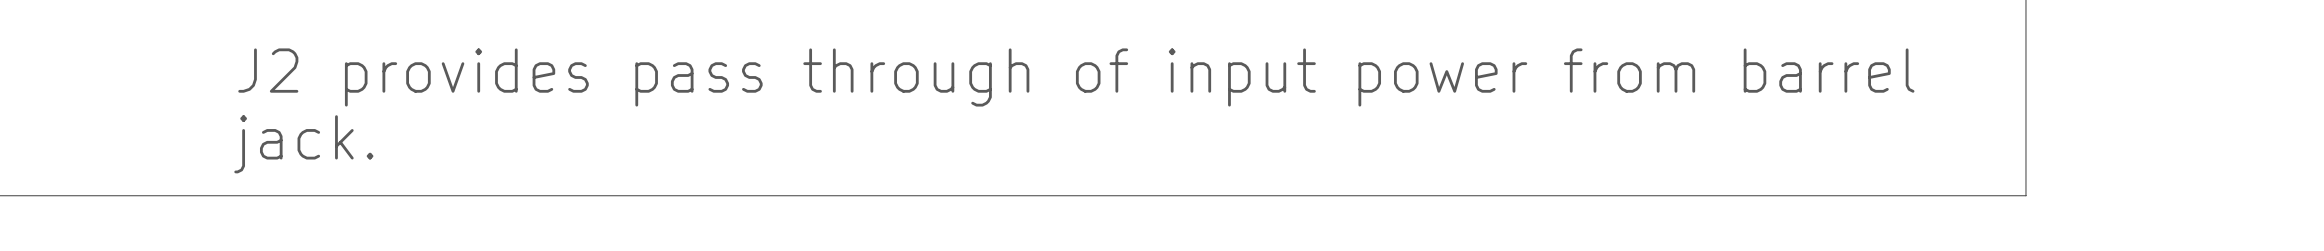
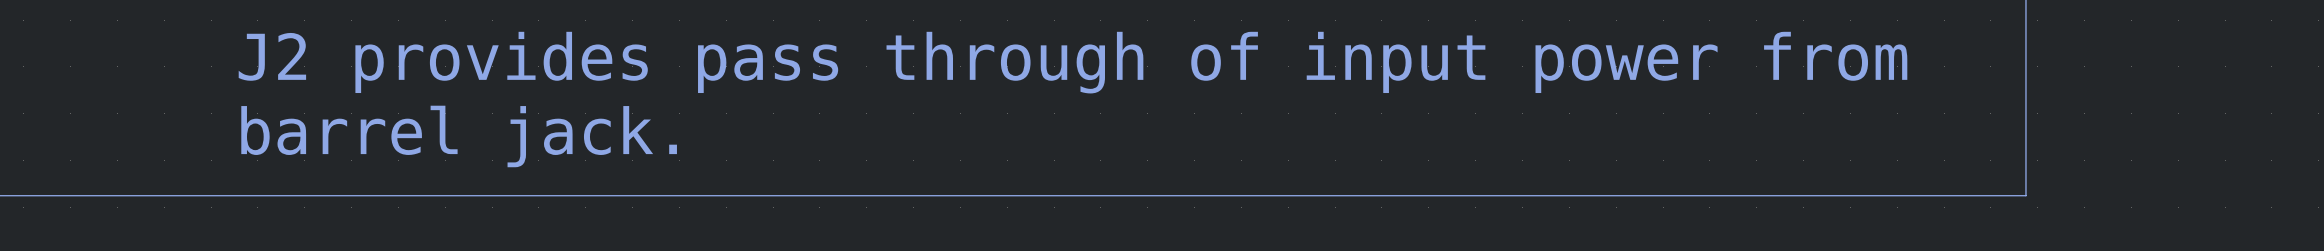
text: J2 provides pass through of input power from barrel (1076, 77) -> J2 provides pass through of input power from (1073, 62)
text: jack. (303, 144) -> barrel jack. (459, 136)

